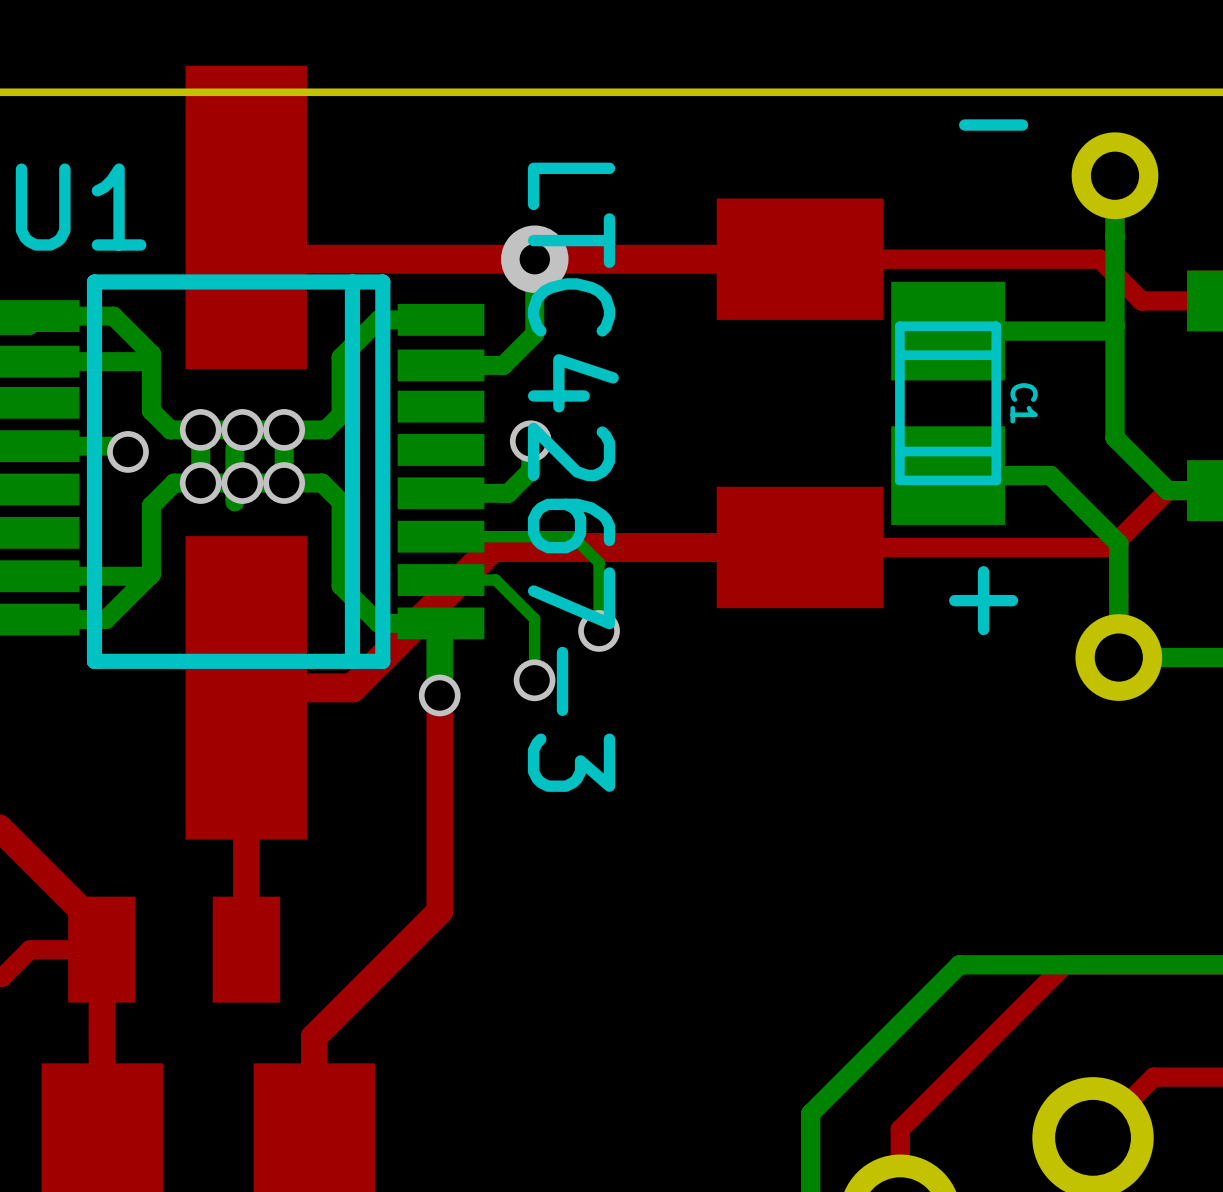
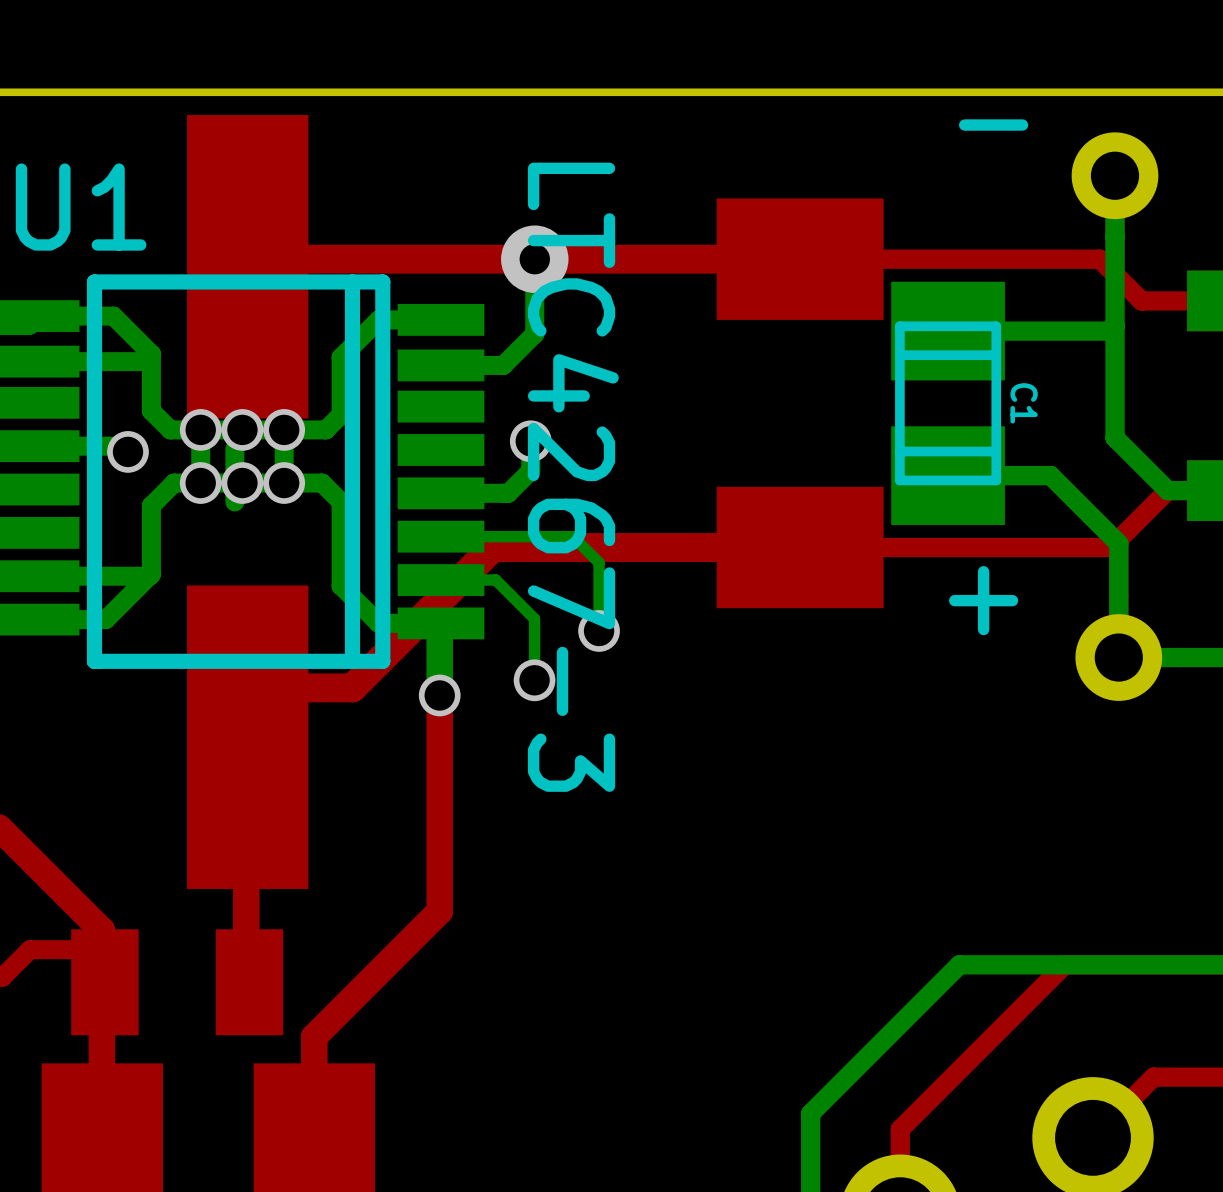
part position: (246, 452) -> (247, 501)
part position: (174, 949) -> (177, 982)

